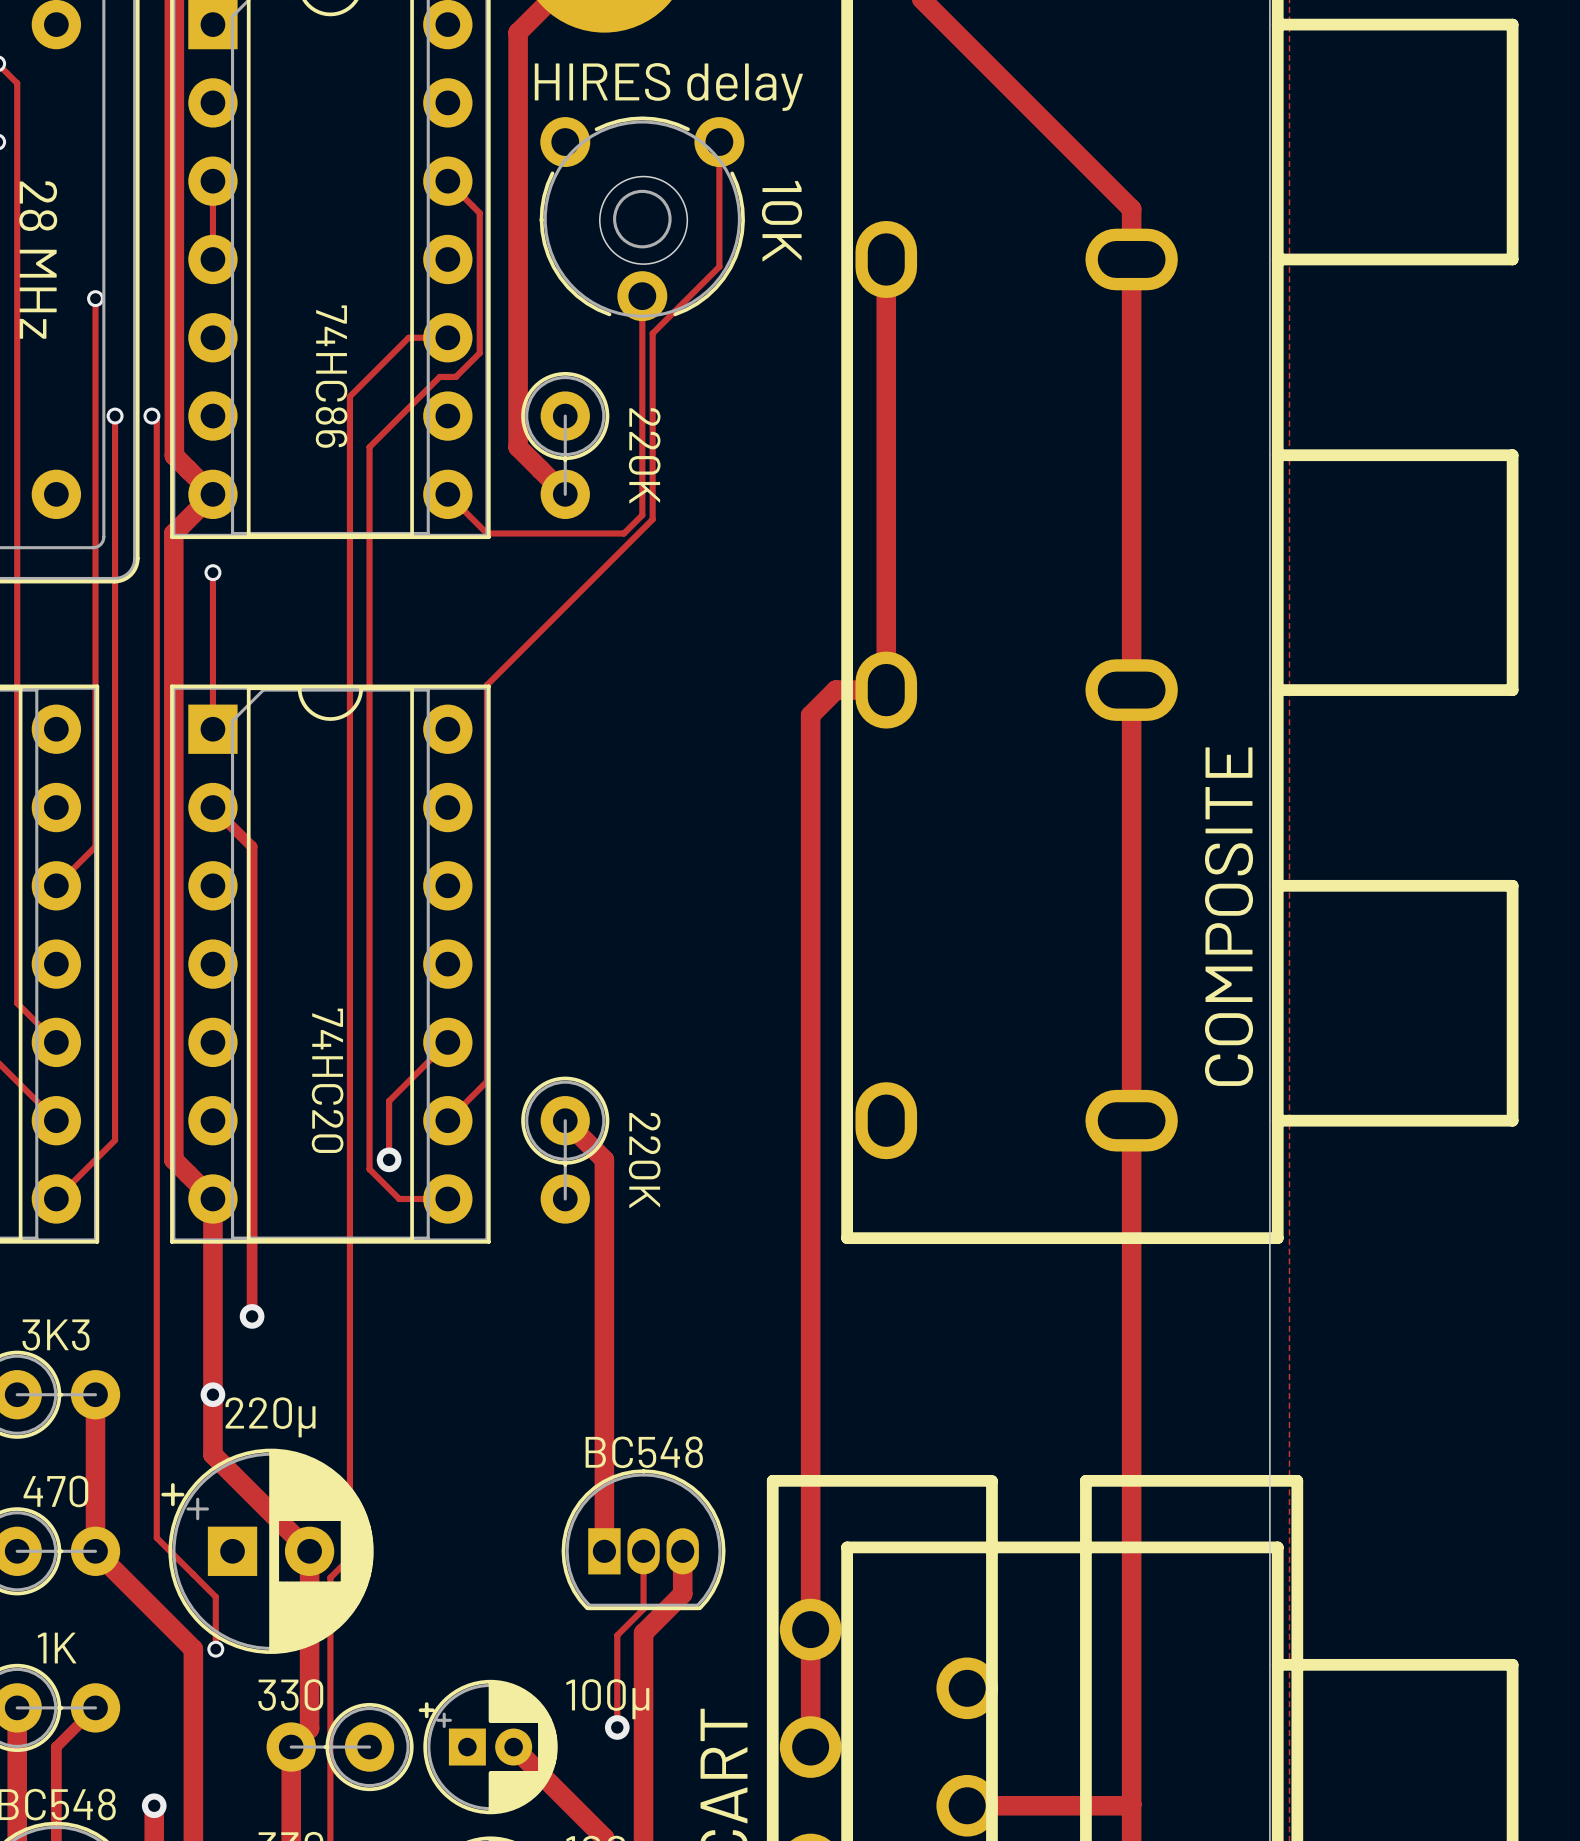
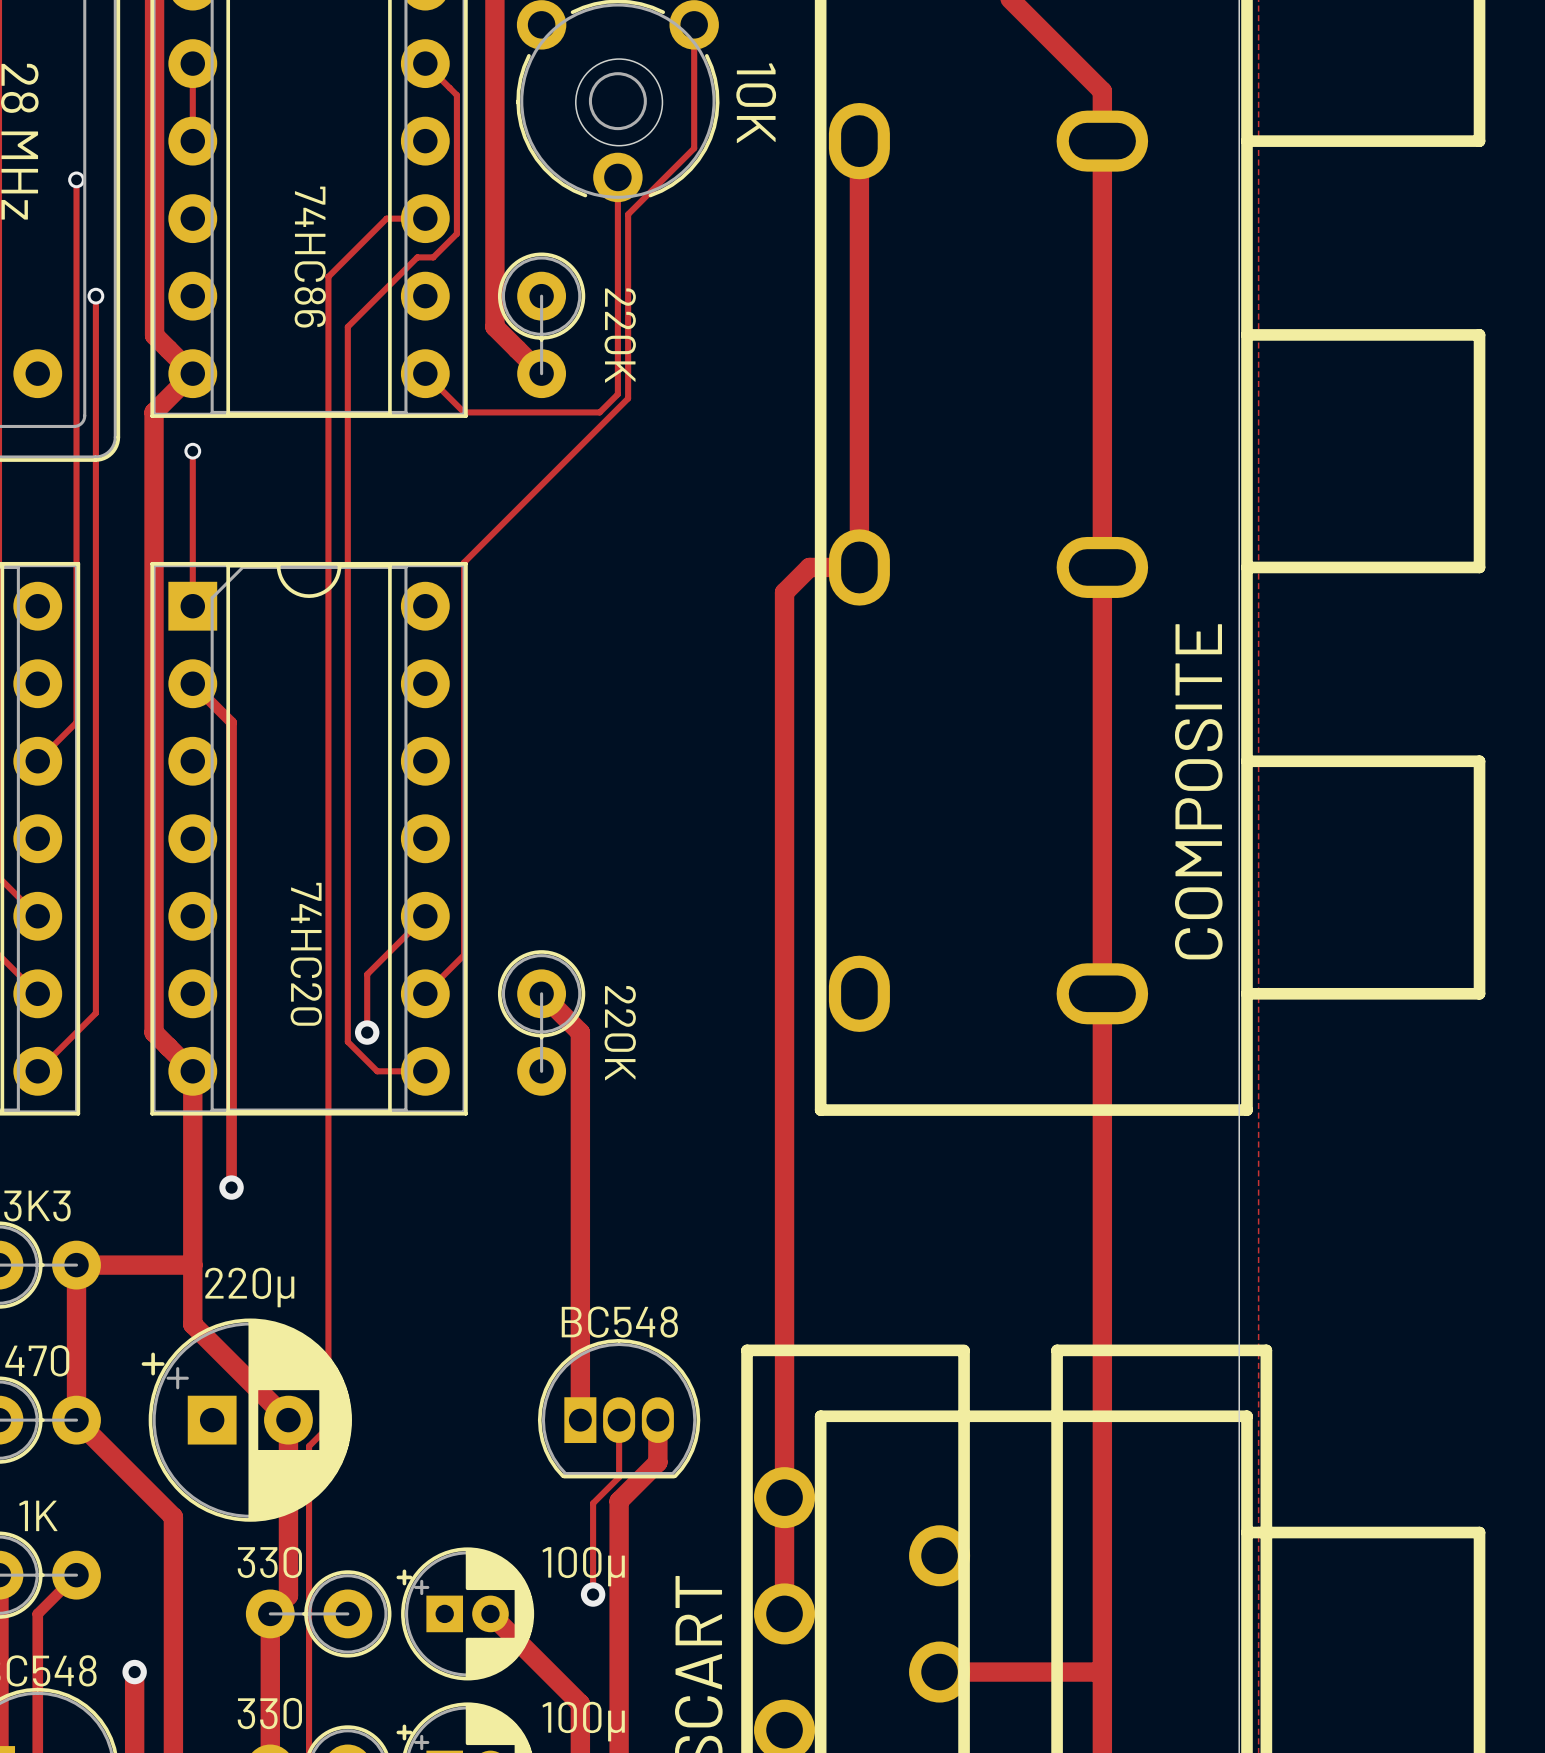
track: (151, 416) (156, 420) (156, 1537) (215, 1596) (215, 1649) -> none
via: (151, 416) -> none
track: none -> (76, 1265) (192, 1265)
via: (212, 1394) -> none
via: (215, 1649) -> none

